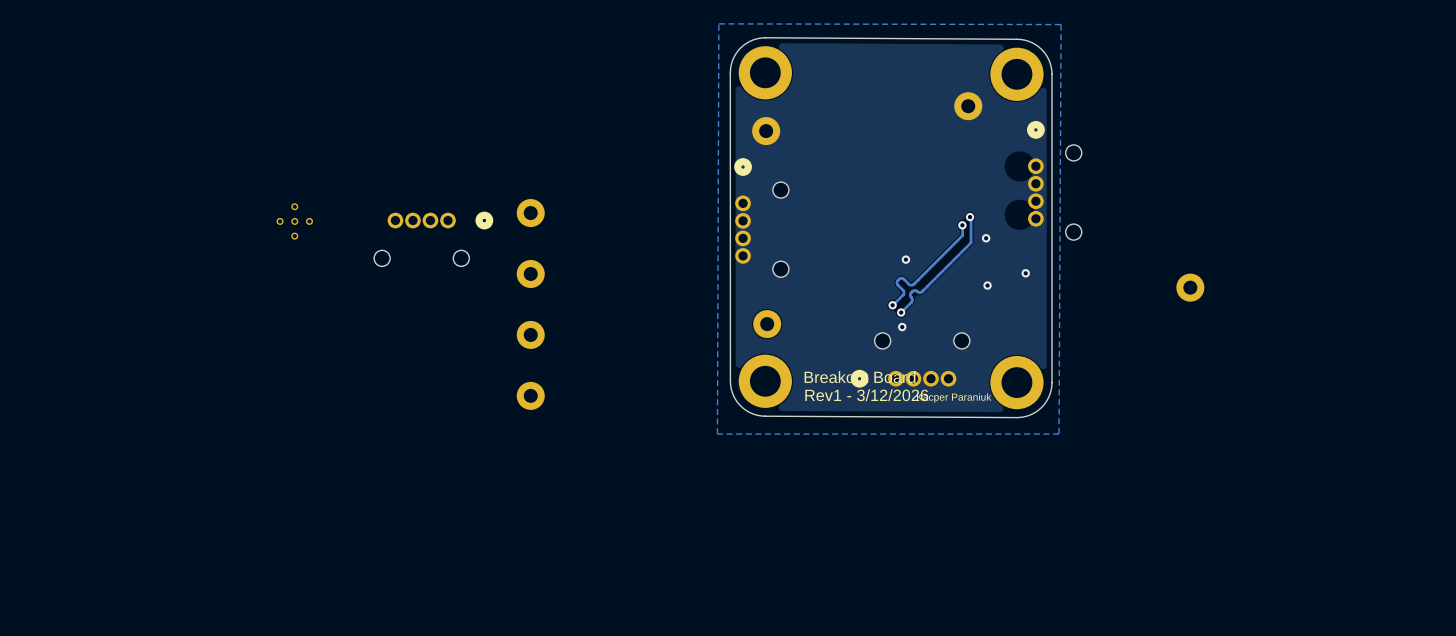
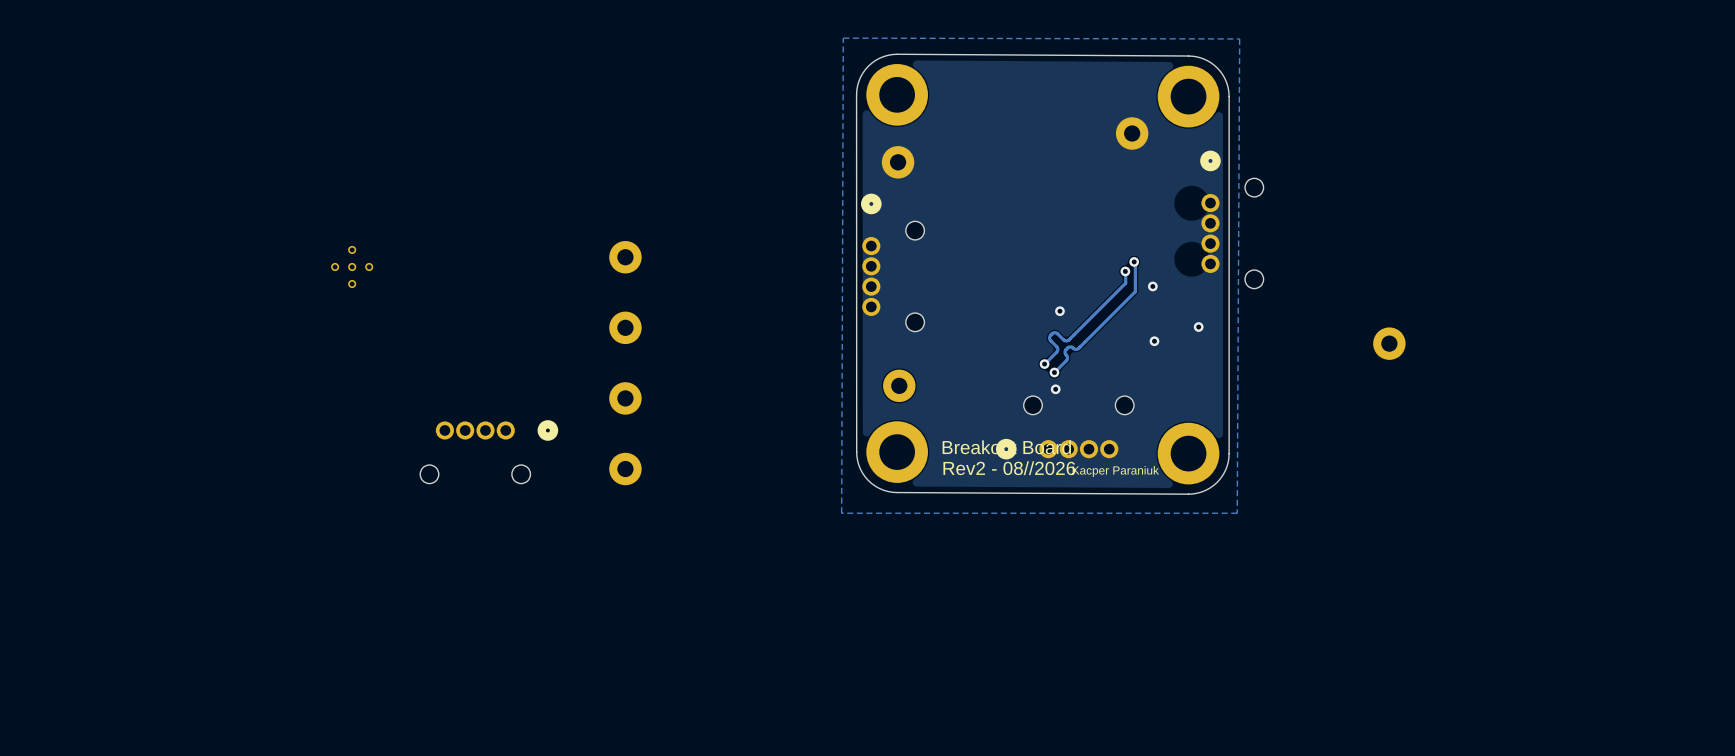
part position: (433, 239) -> (489, 451)
text: Rev1 - 3/12/2026 (866, 395) -> Rev2 - 08//2026 (1009, 468)

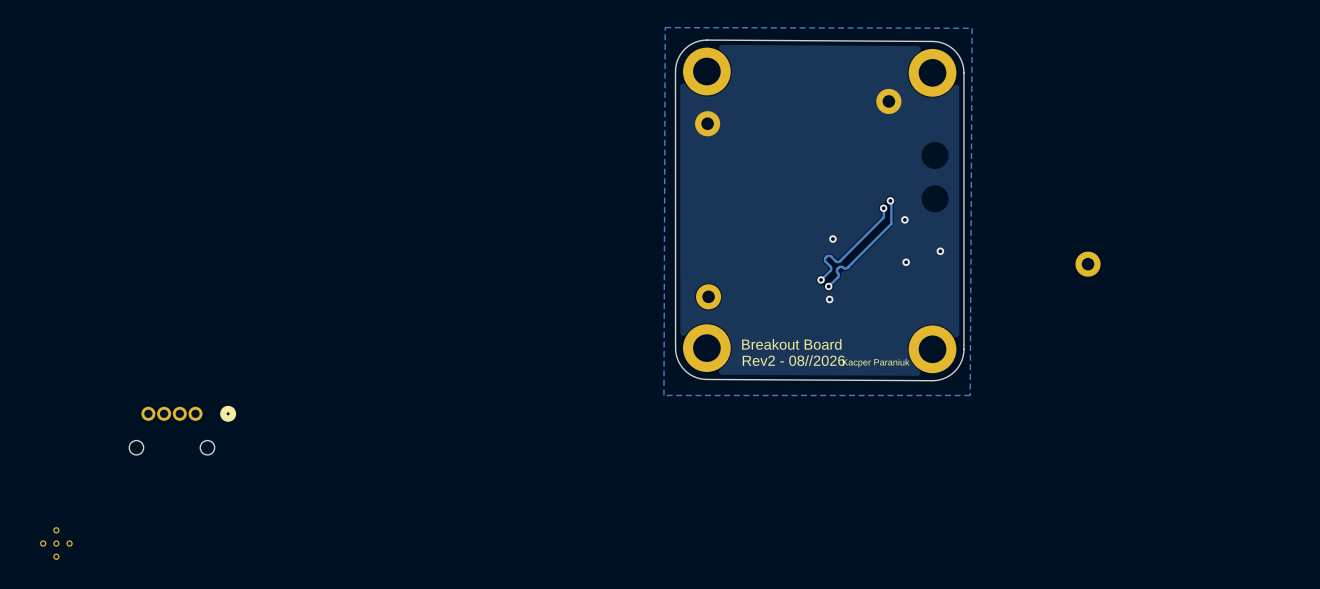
part: (1231, 219) -> none
part: (625, 257) -> none
part: (892, 262) -> none
part: (352, 266) -> none
part: (625, 327) -> none
part: (625, 398) -> none
part: (1064, 427) -> none
part position: (489, 451) -> (182, 430)
part: (625, 469) -> none
part: none -> (56, 543)

